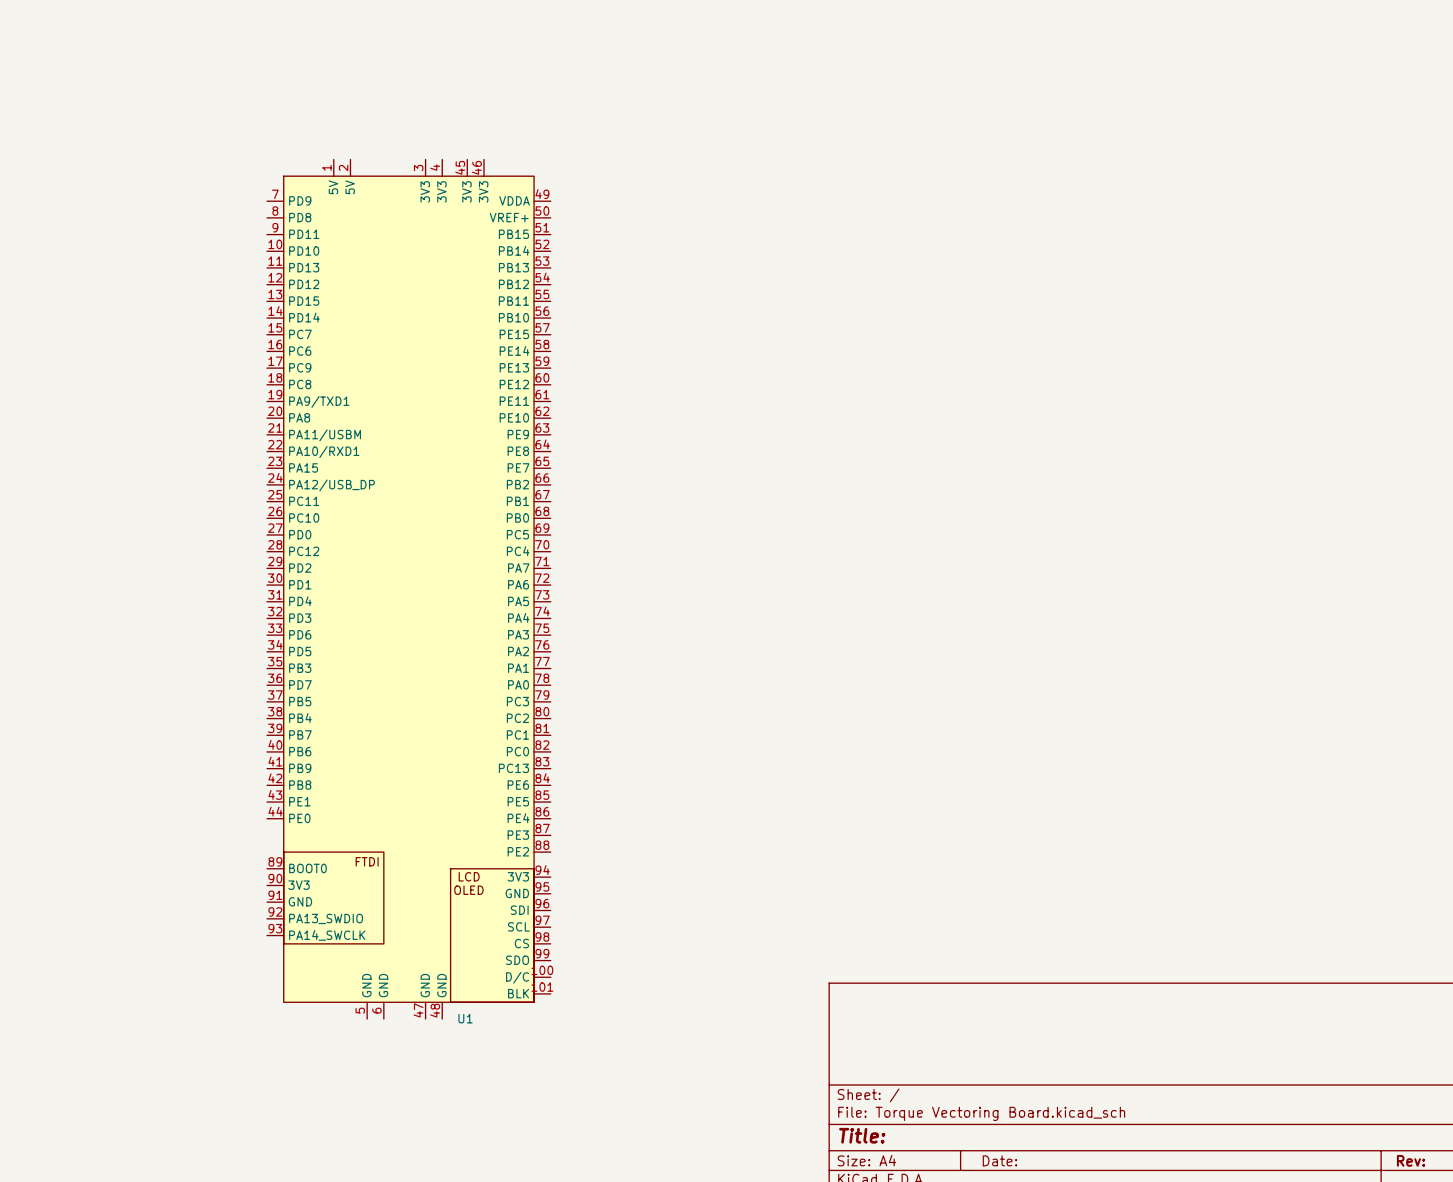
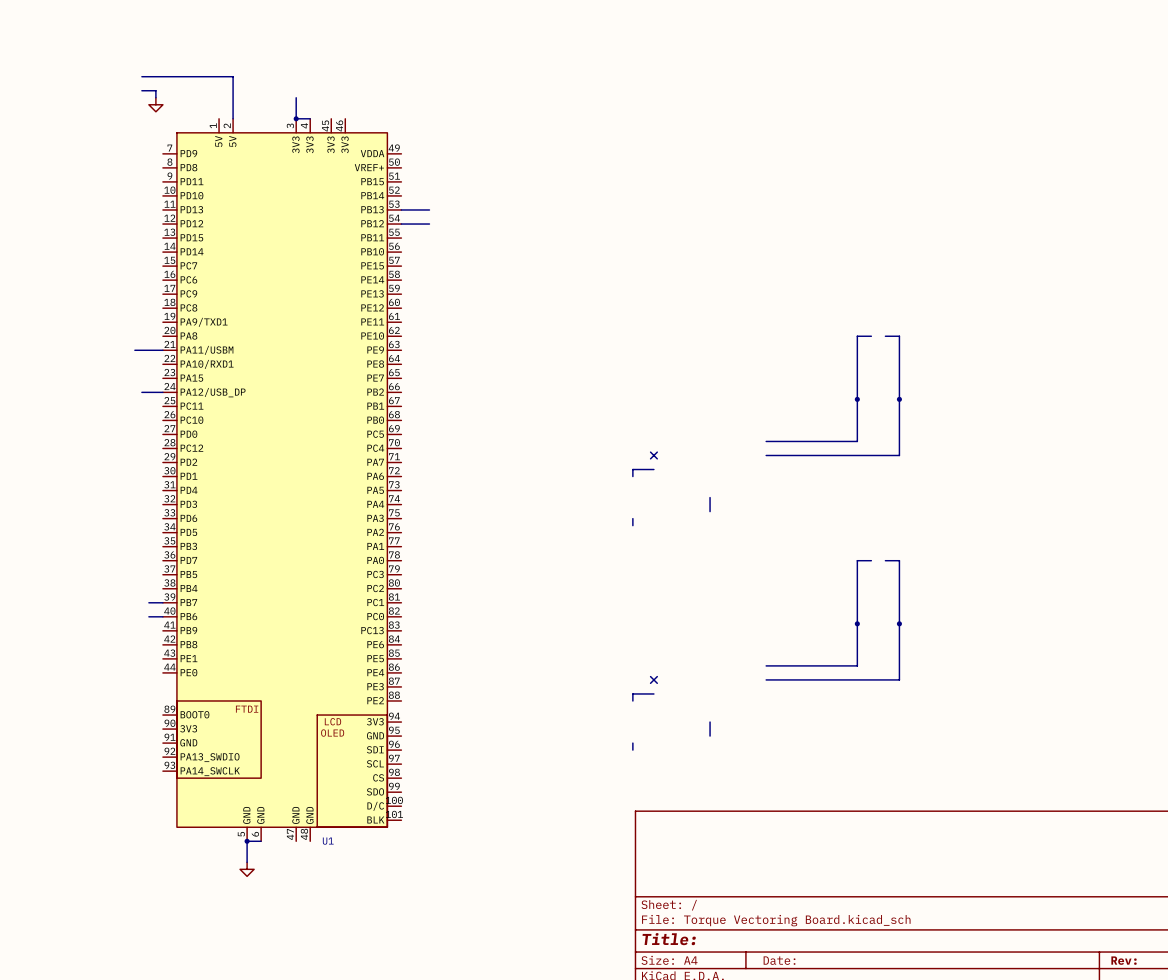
wire: none -> (141, 76) (233, 76) (233, 118)
wire: none -> (141, 90) (155, 90) (155, 97)
wire: none -> (296, 97) (296, 118) (310, 118)
power symbol: none -> (155, 104)
junction: none -> (296, 118)
wire: none -> (401, 209) (429, 209)
wire: none -> (401, 224) (429, 224)
wire: none -> (871, 336) (857, 336) (857, 441) (766, 441)
wire: none -> (885, 336) (899, 336) (899, 455) (766, 455)
wire: none -> (134, 350) (162, 350)
wire: none -> (141, 392) (162, 392)
junction: none -> (857, 399)
junction: none -> (899, 399)
no-connect mark: none -> (653, 455)
wire: none -> (653, 469) (632, 469) (632, 476)
wire: none -> (710, 497) (710, 511)
wire: none -> (632, 518) (632, 525)
wire: none -> (871, 560) (857, 560) (857, 665) (766, 665)
wire: none -> (885, 560) (899, 560) (899, 679) (766, 679)
wire: none -> (148, 602) (162, 602)
wire: none -> (148, 616) (162, 616)
junction: none -> (857, 623)
junction: none -> (899, 623)
no-connect mark: none -> (653, 679)
wire: none -> (653, 693) (632, 693) (632, 700)
wire: none -> (710, 722) (710, 736)
wire: none -> (632, 743) (632, 750)
junction: none -> (247, 841)
wire: none -> (261, 841) (247, 841) (247, 862)
power symbol: none -> (247, 869)

